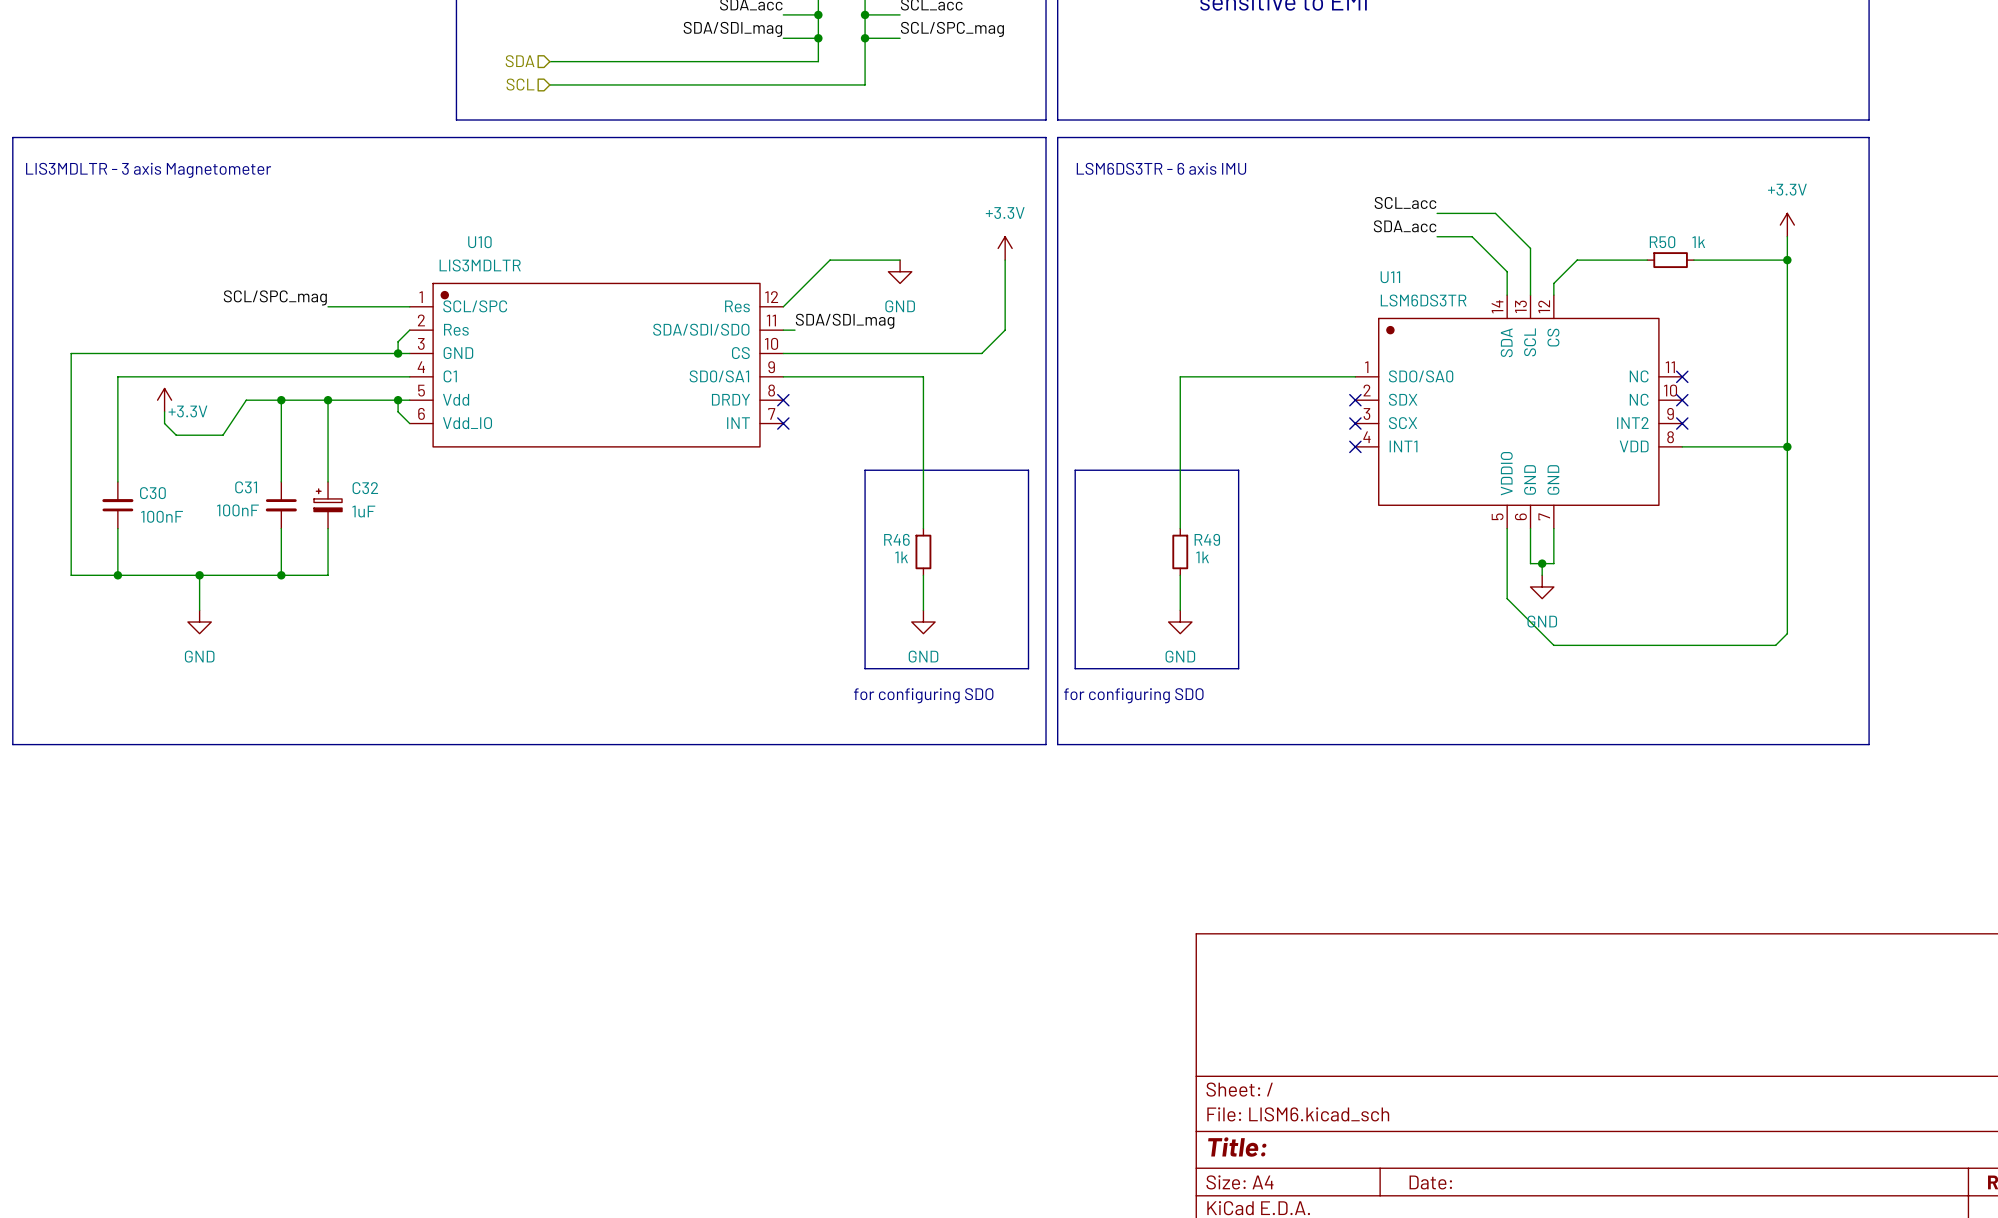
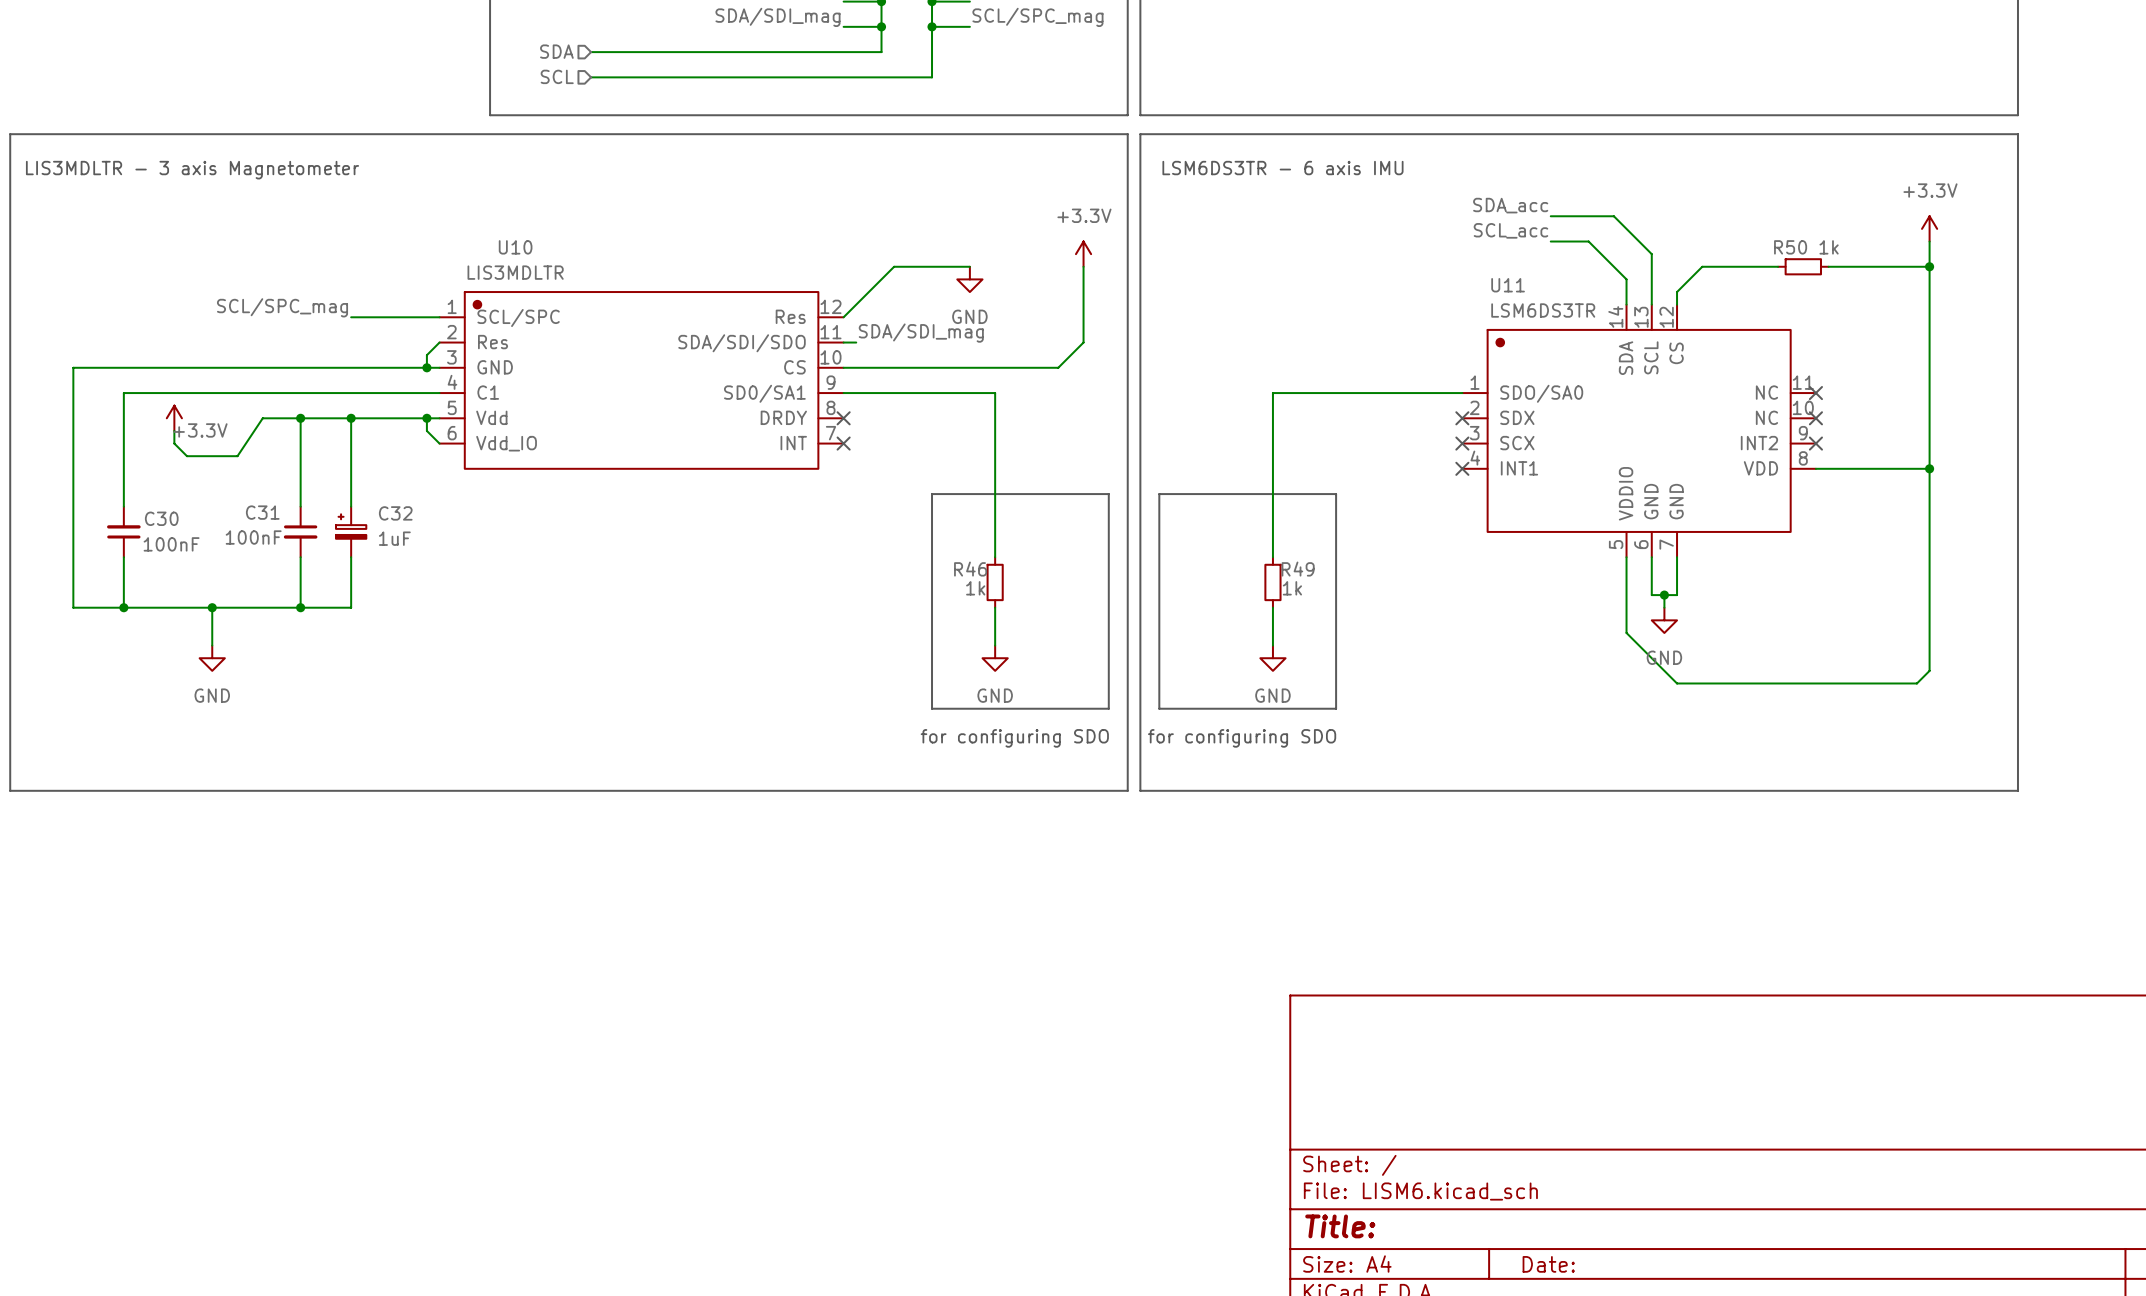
label: SCL_acc (1405, 202) -> SDA_acc (1510, 205)
label: SDA_acc (1405, 226) -> SCL_acc (1510, 230)

